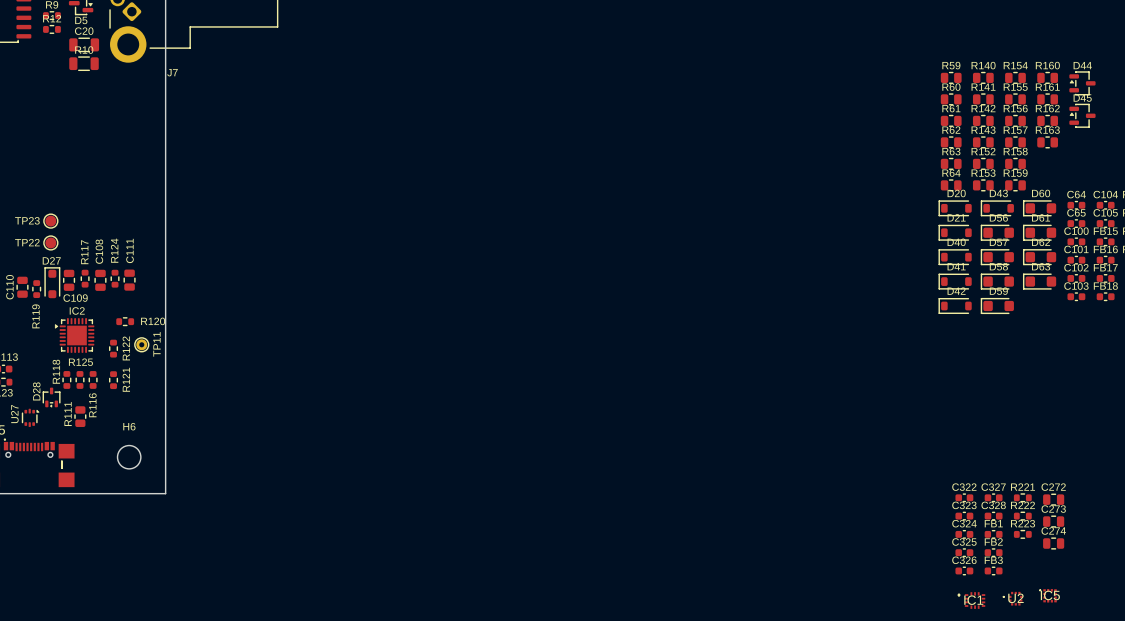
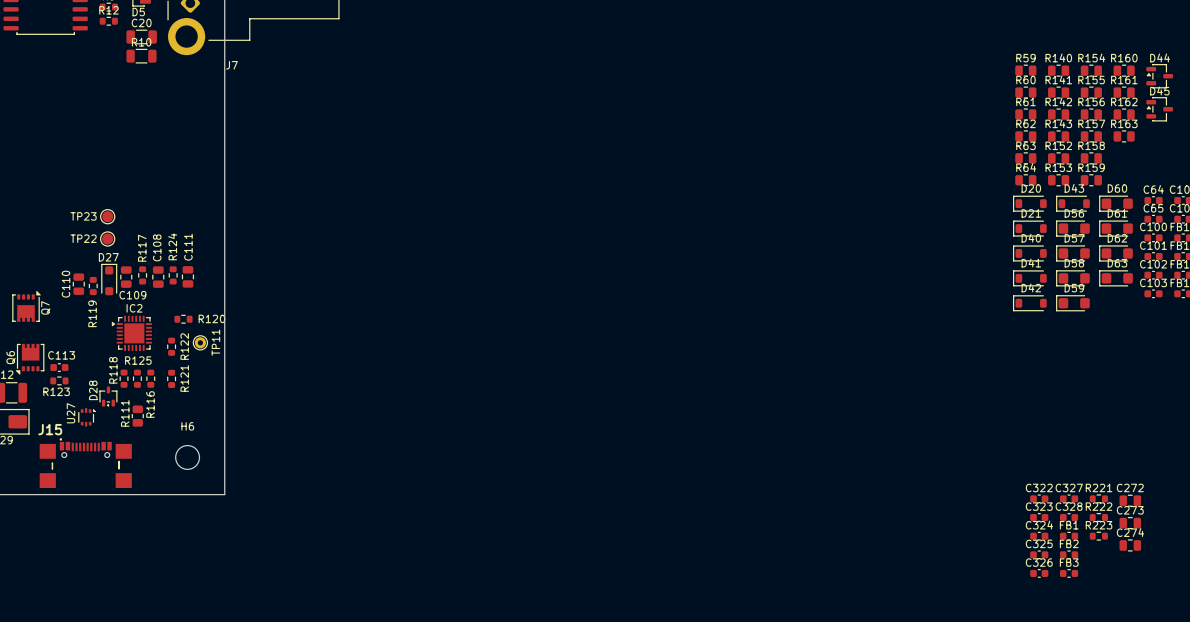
IC5: (1048, 595) -> none
U2: (1012, 598) -> none
IC1: (971, 600) -> none

